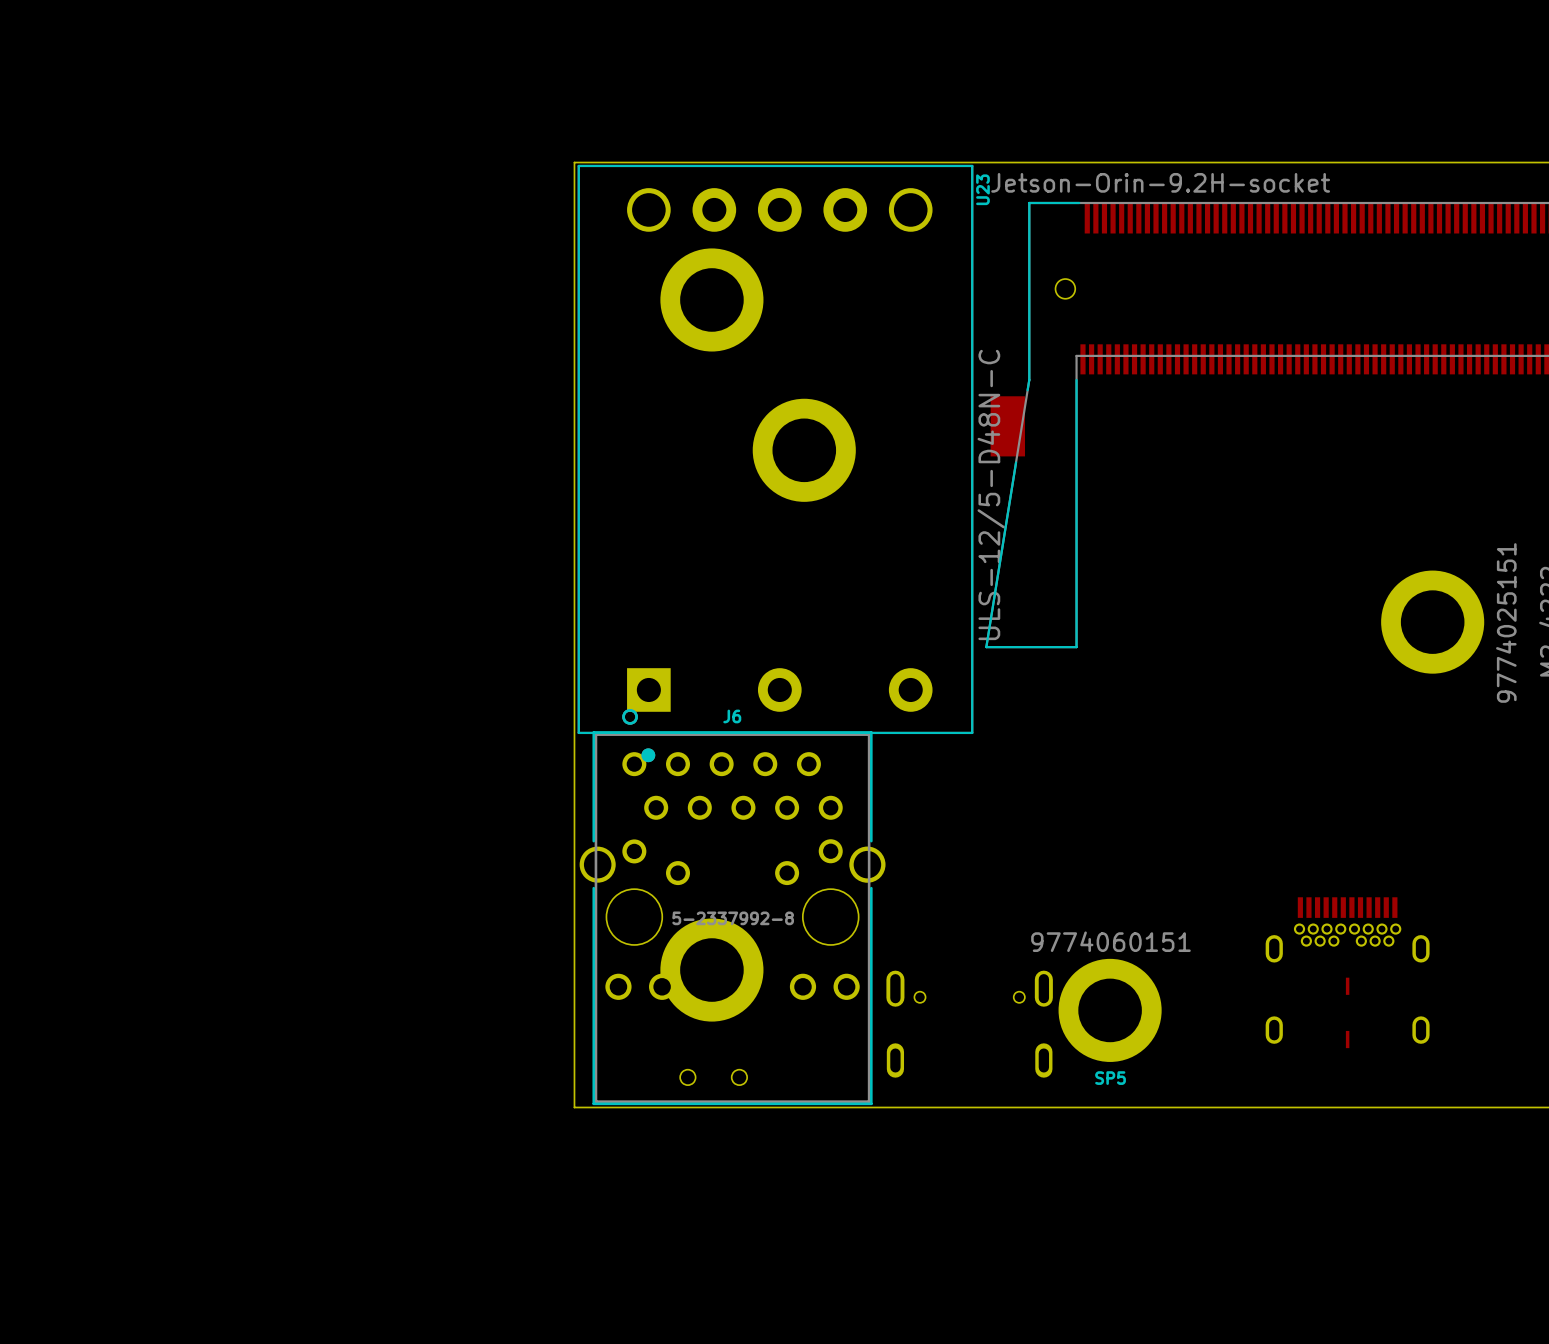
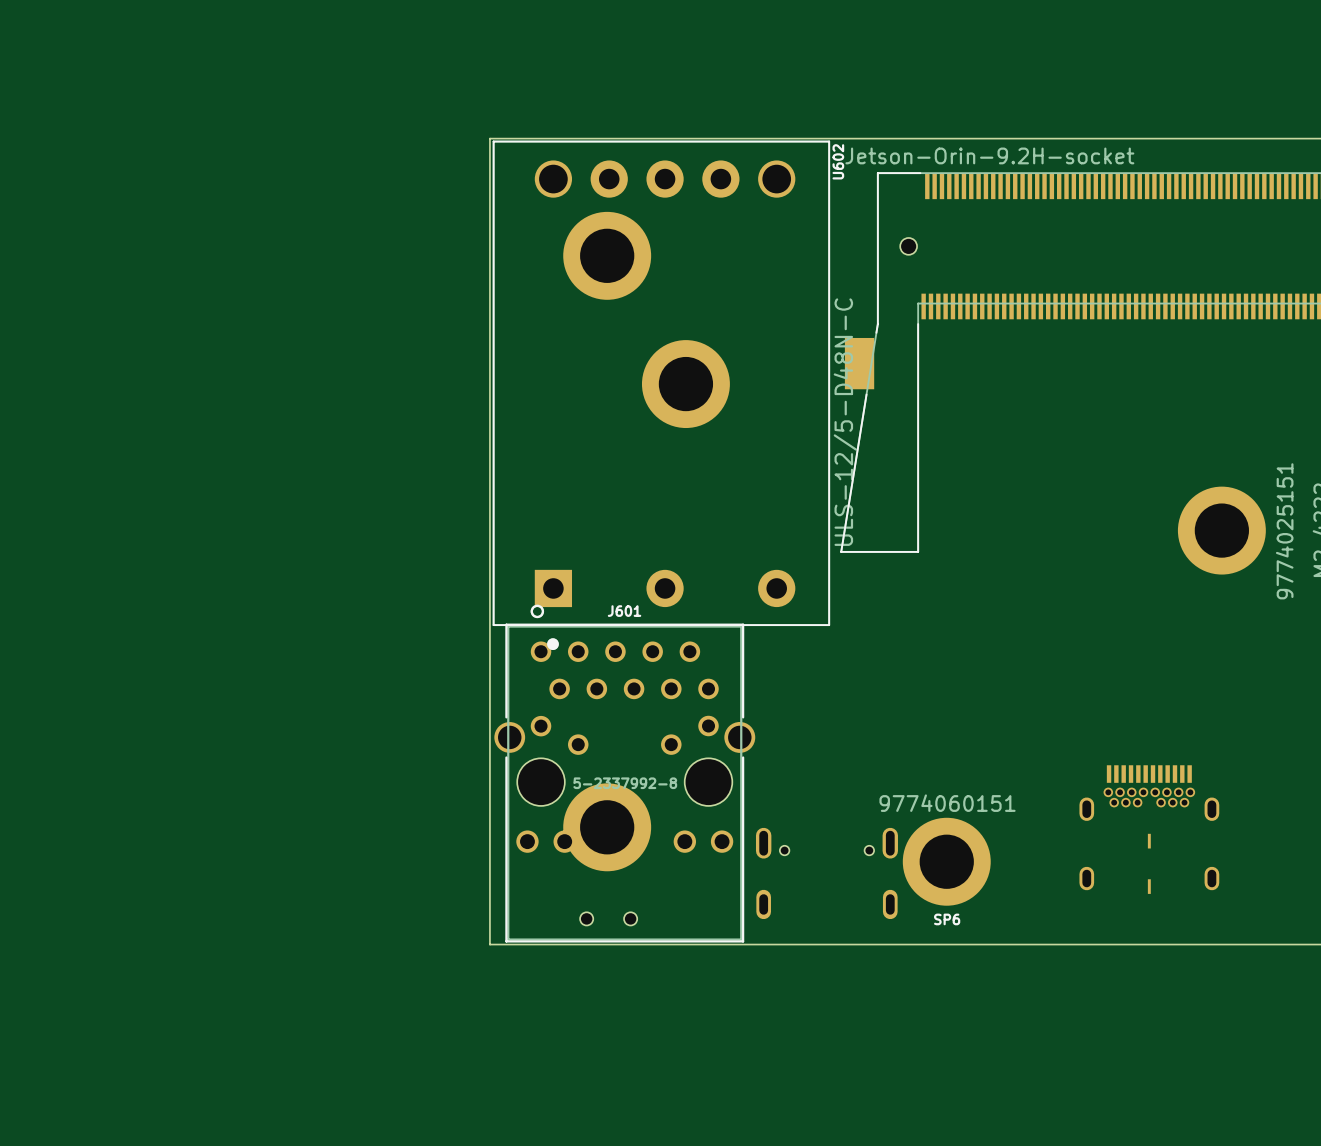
U23 name: U23 (982, 189) -> U602 (838, 161)
J6 name: J6 (732, 716) -> J601 (624, 611)
SP5 name: SP5 (1110, 1078) -> SP6 (947, 919)

